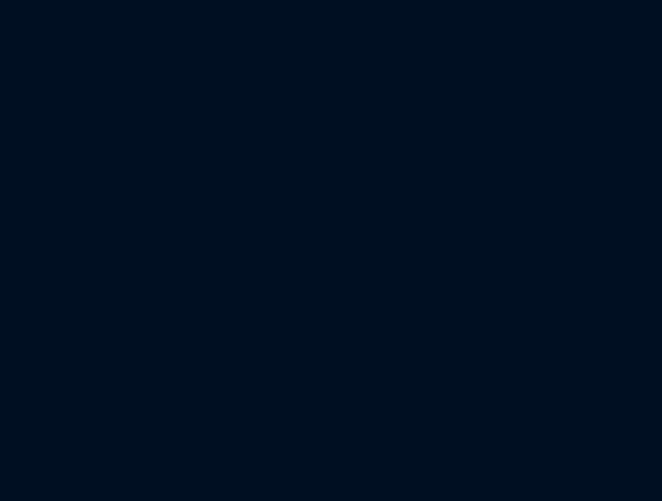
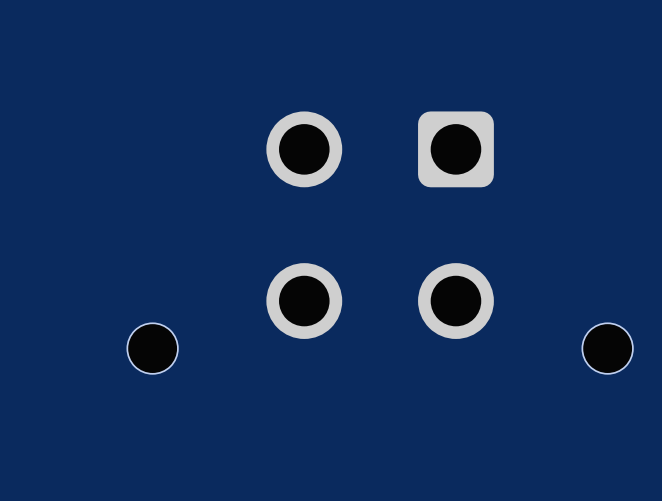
part: none -> (380, 242)

